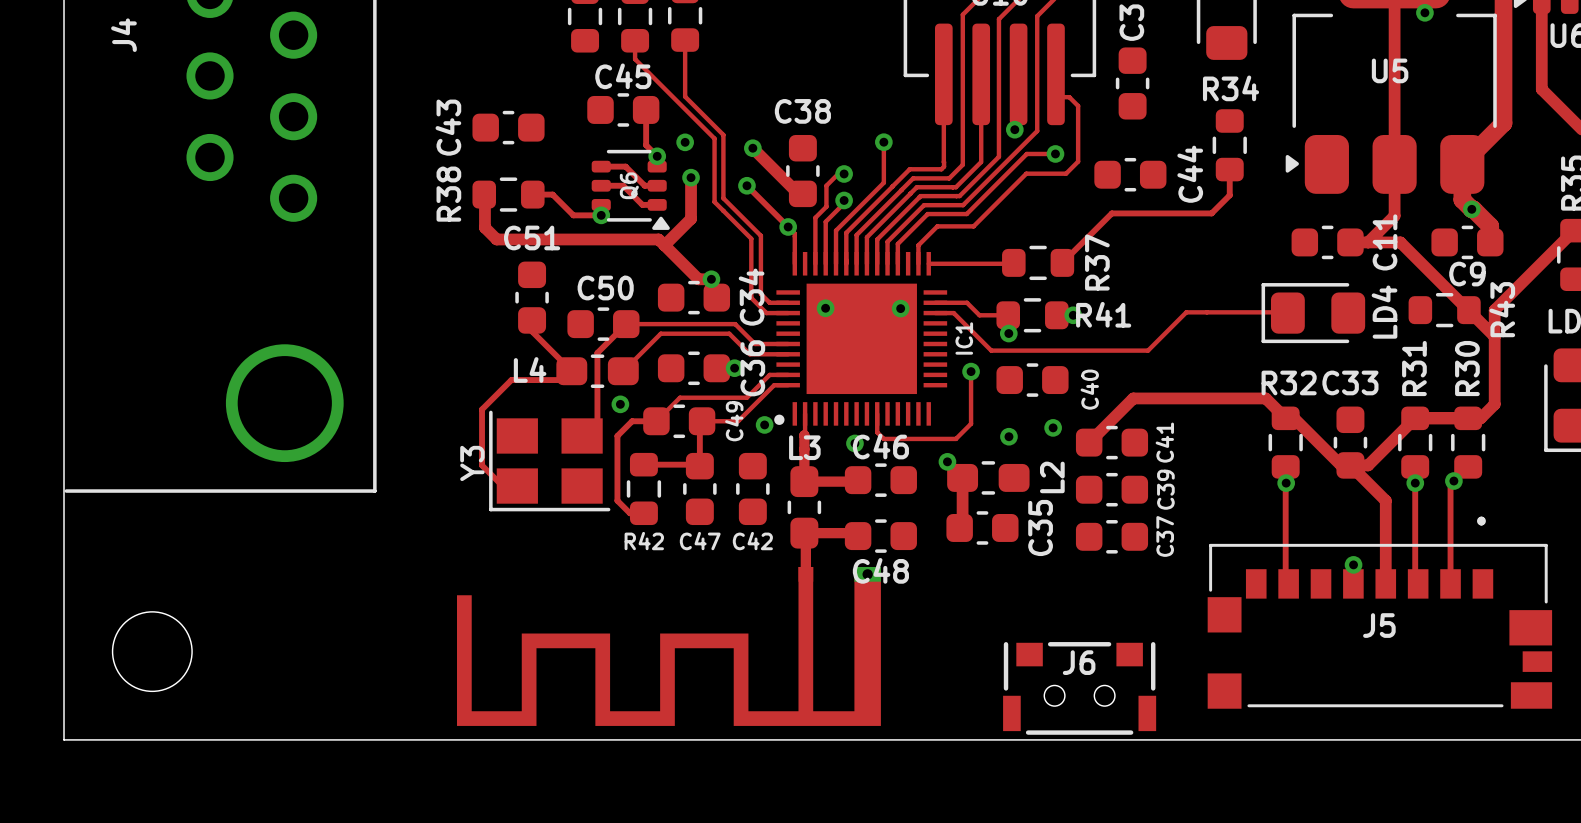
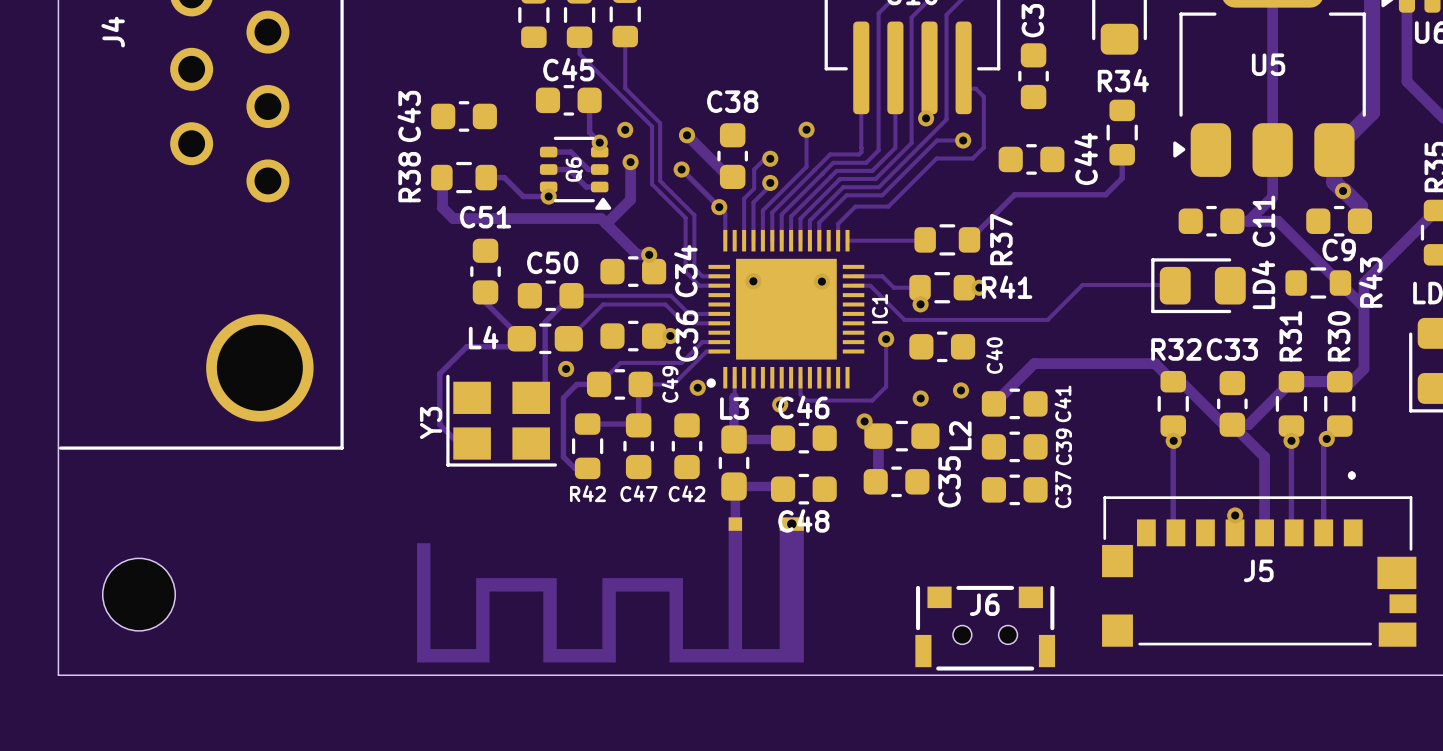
via: (1424, 12) -> none

